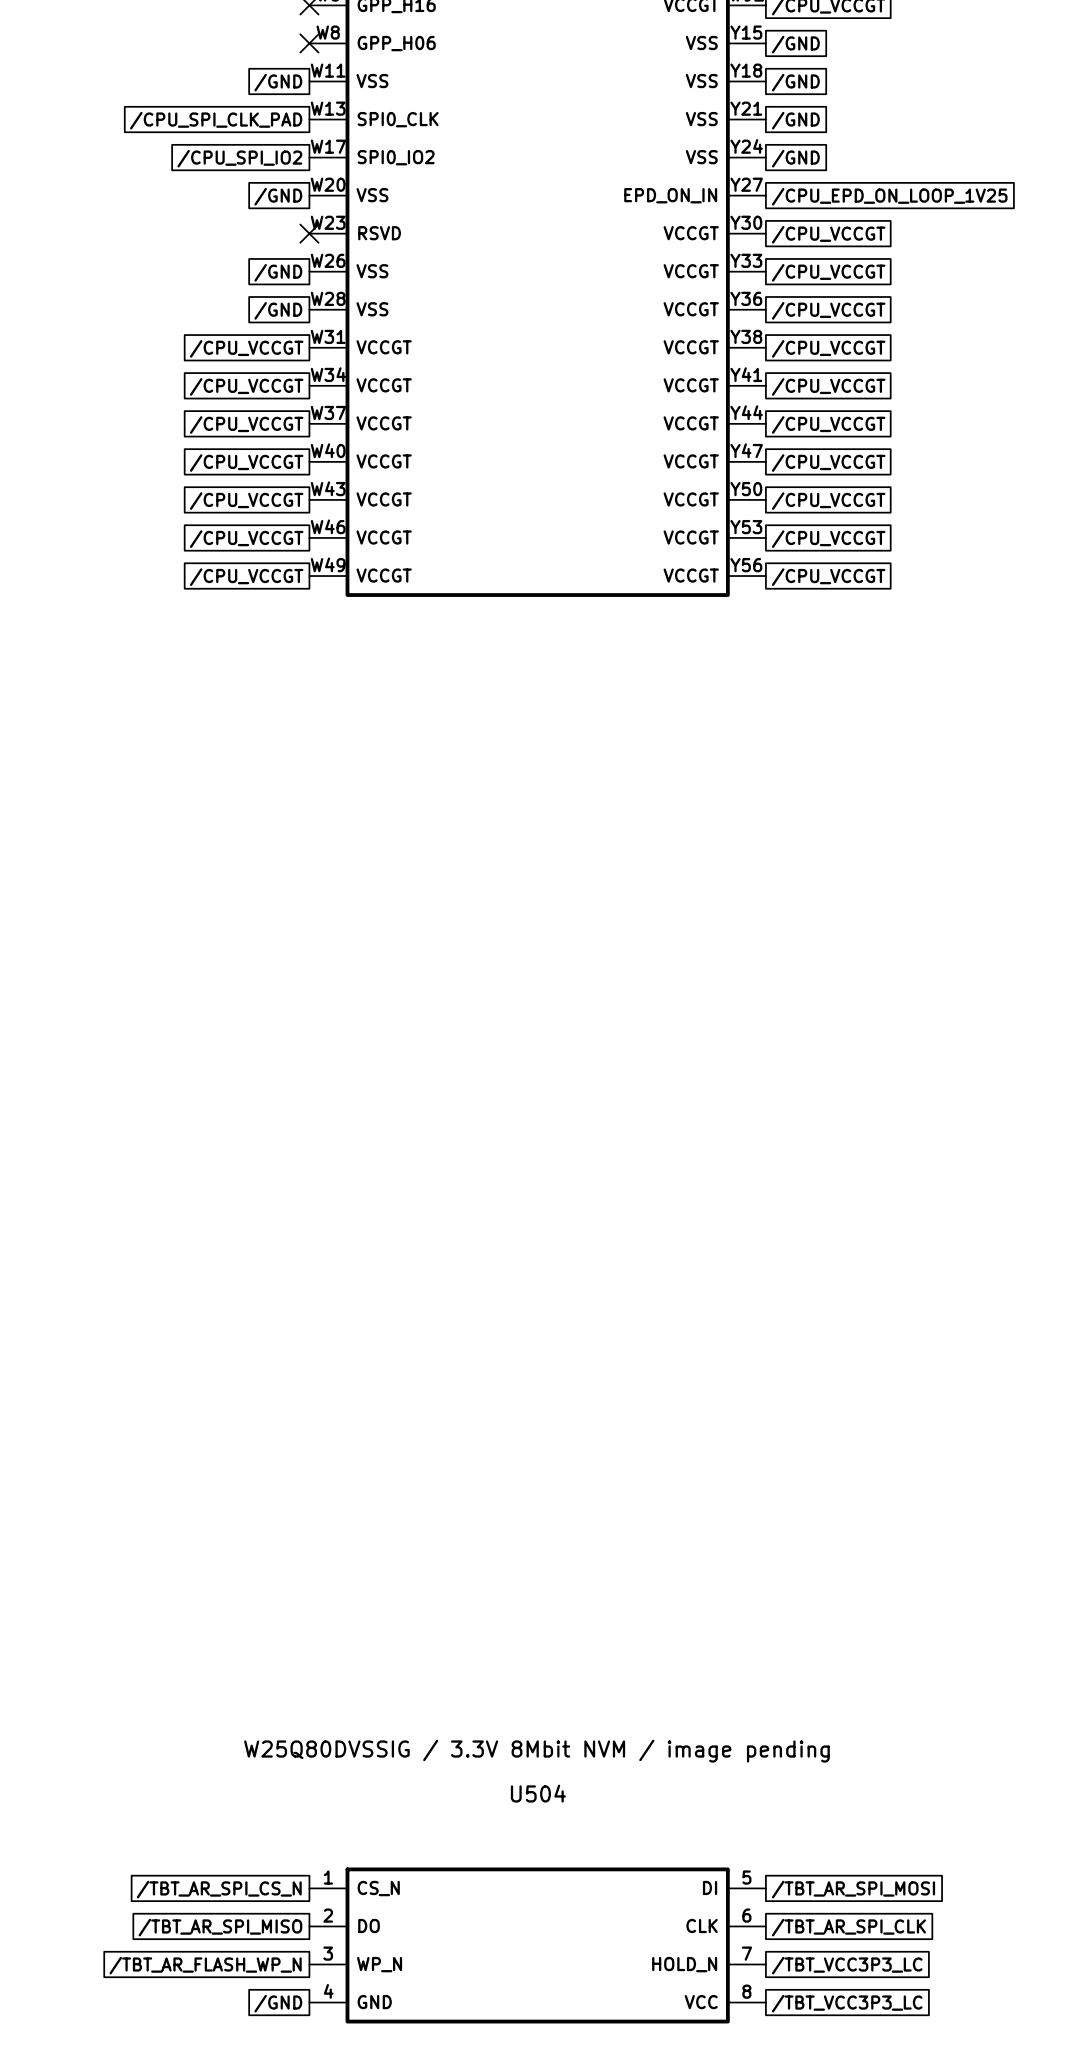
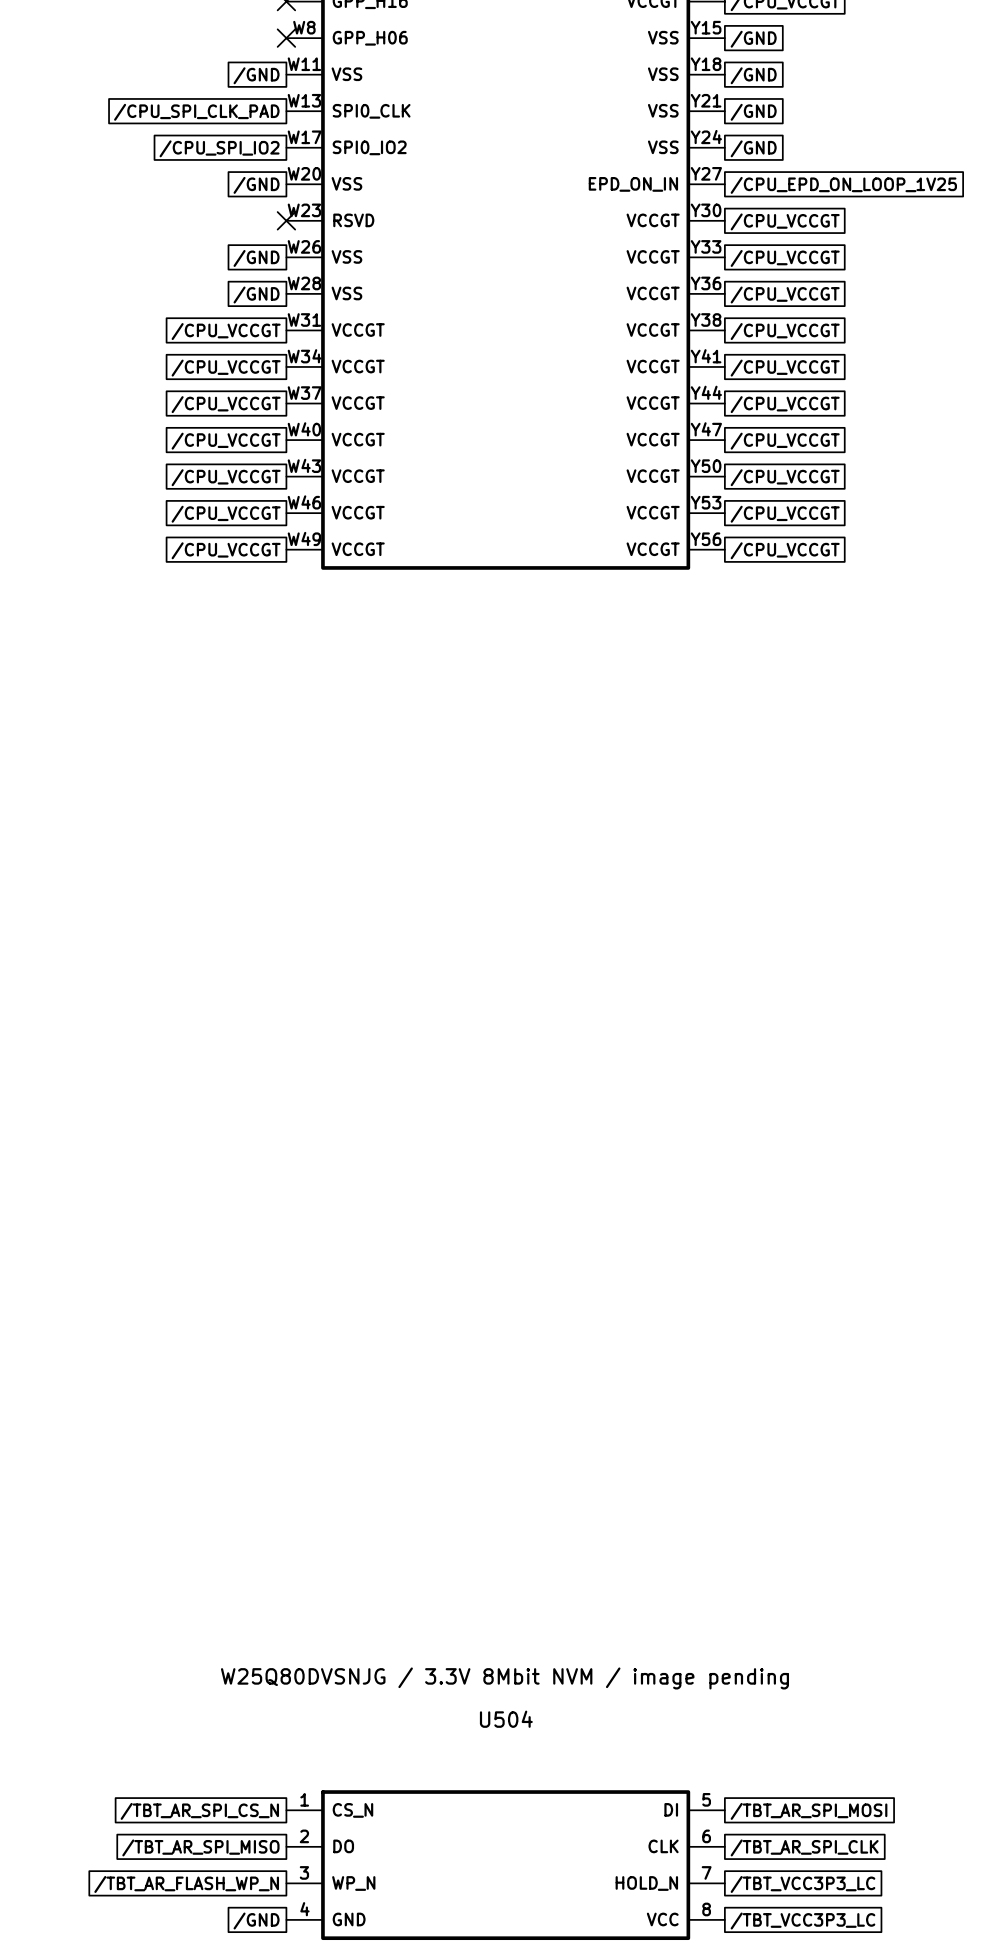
U504 value: W25Q80DVSSIG / 3.3V 8Mbit NVM / image pending (536, 1751) -> W25Q80DVSNJG / 3.3V 8Mbit NVM / image pending (504, 1678)

